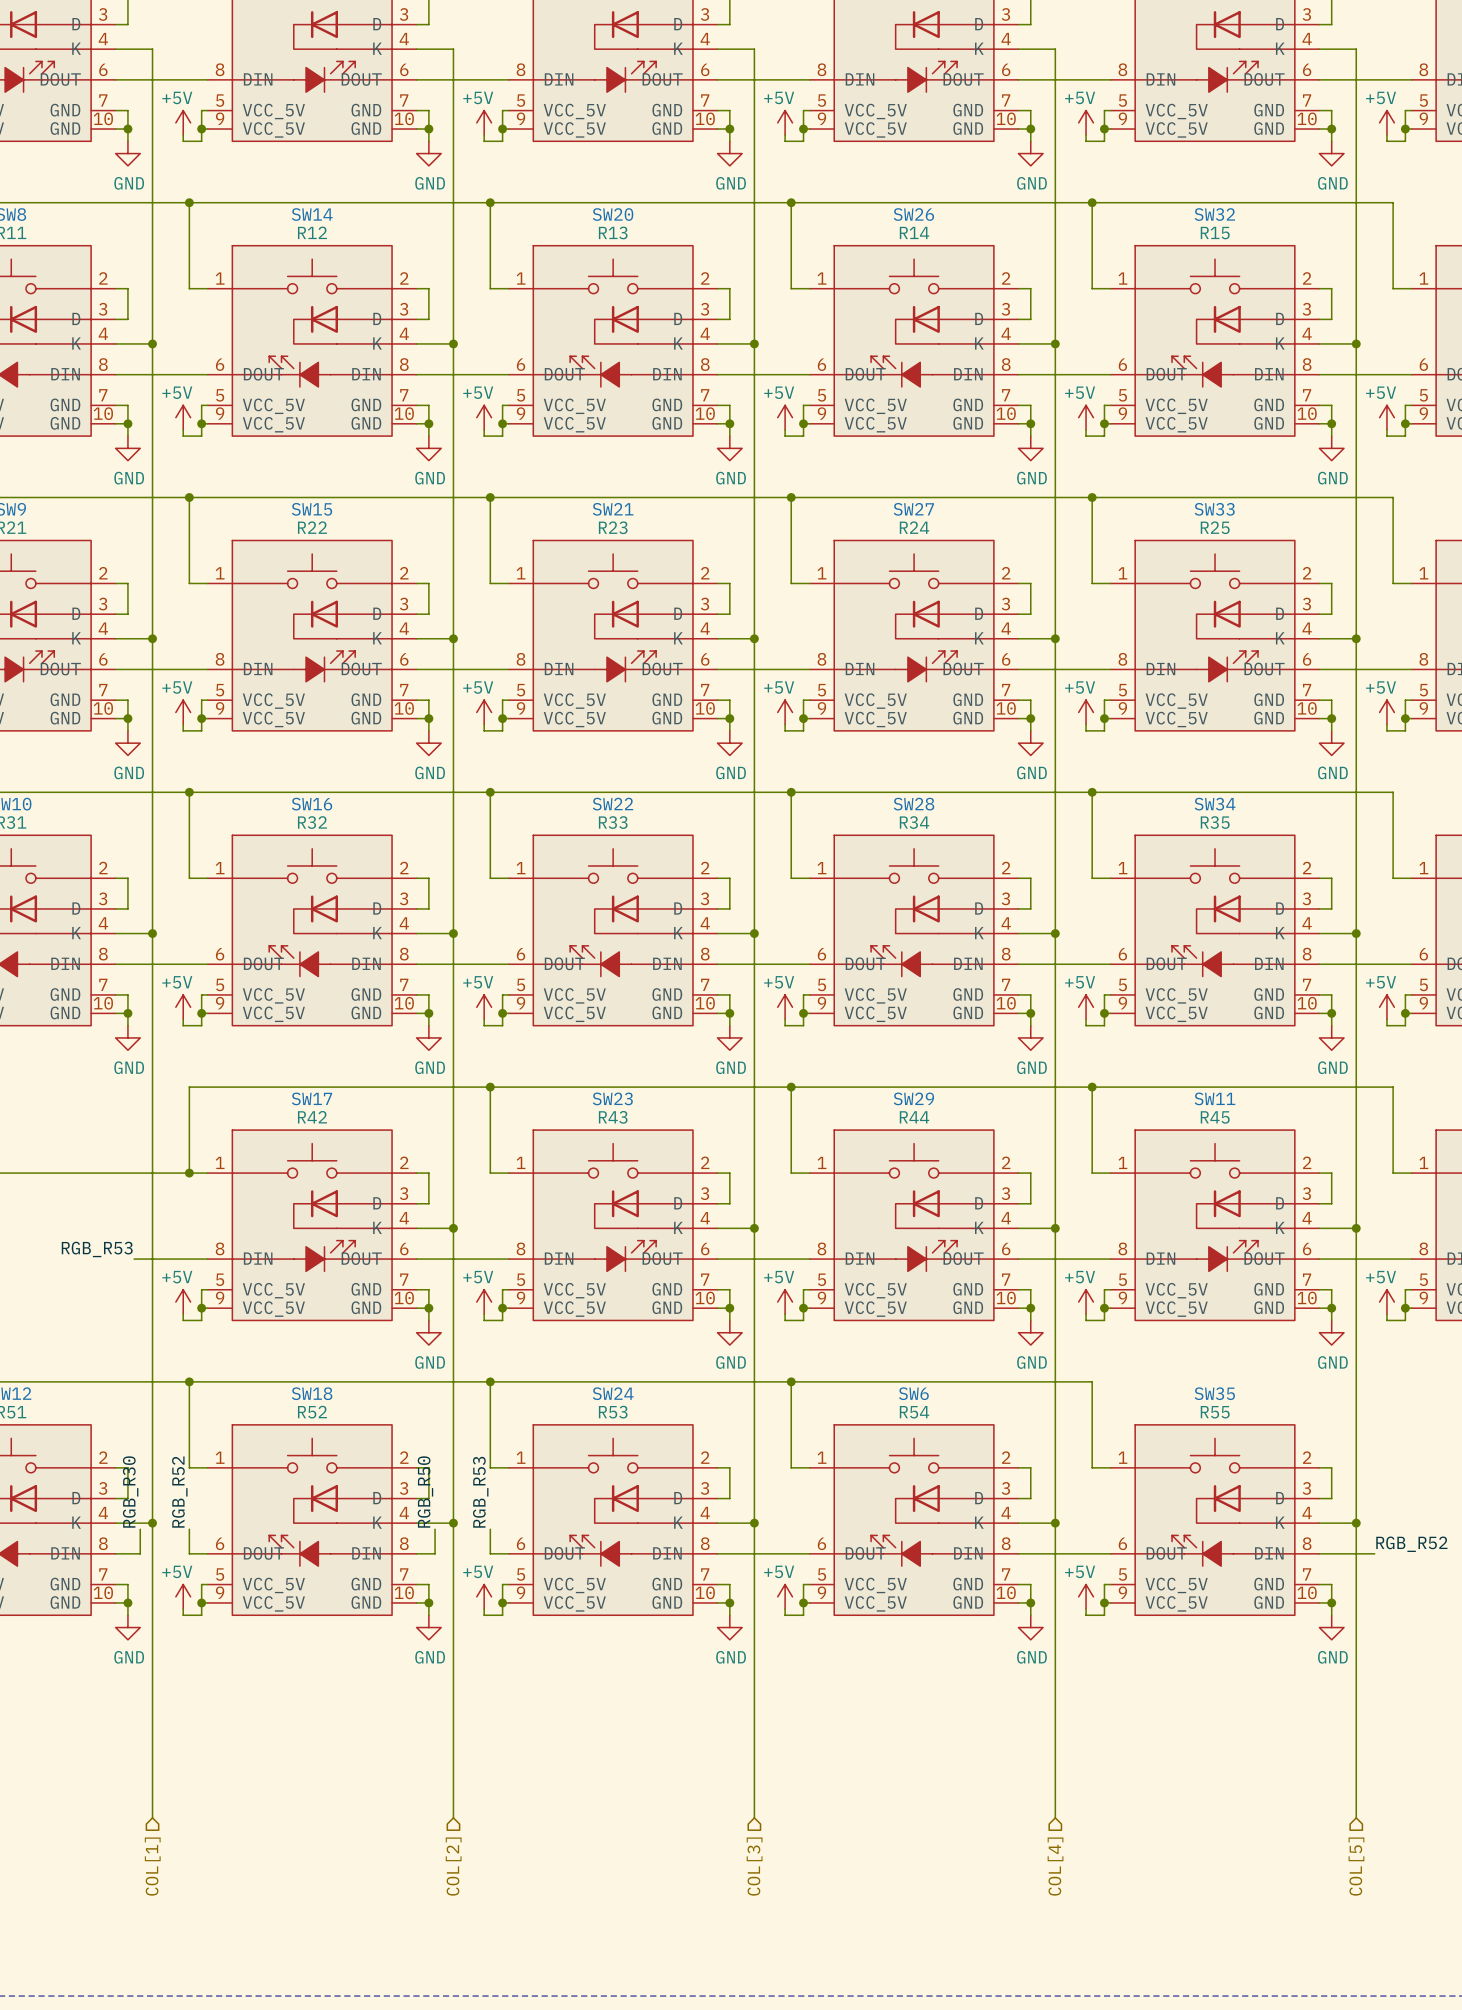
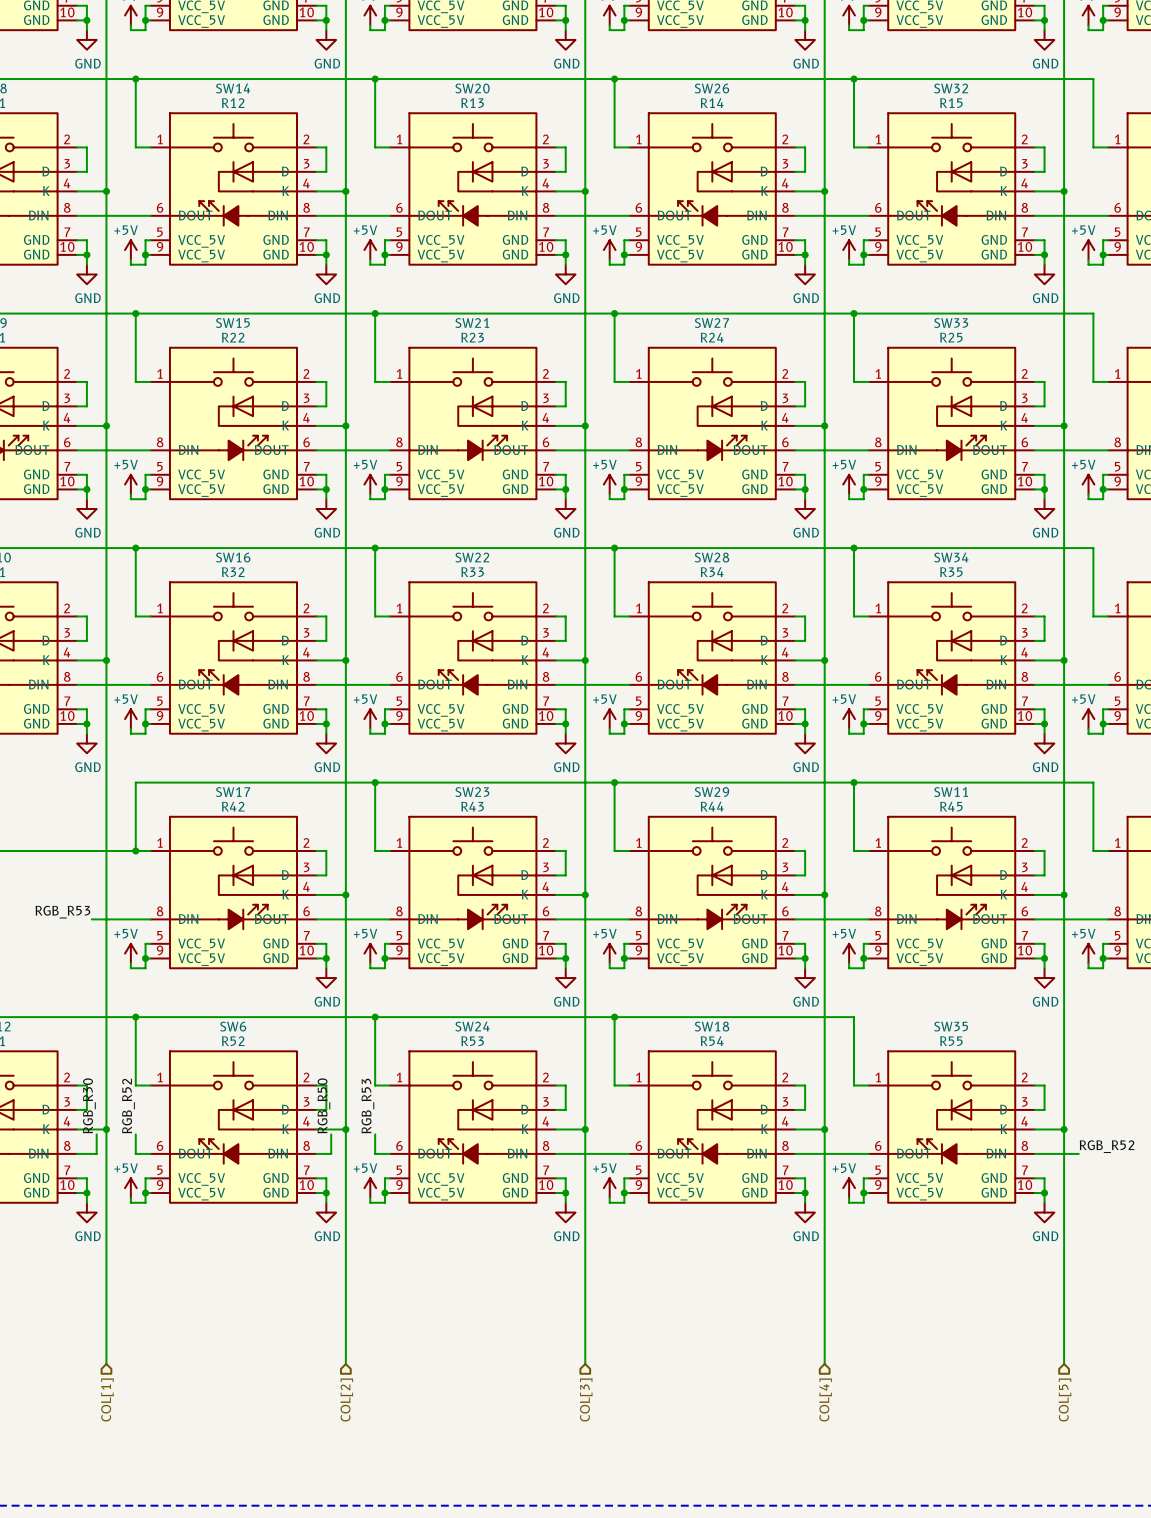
SW18 name: SW18 (312, 1393) -> SW6 (233, 1026)
SW6 name: SW6 (913, 1393) -> SW18 (712, 1026)

